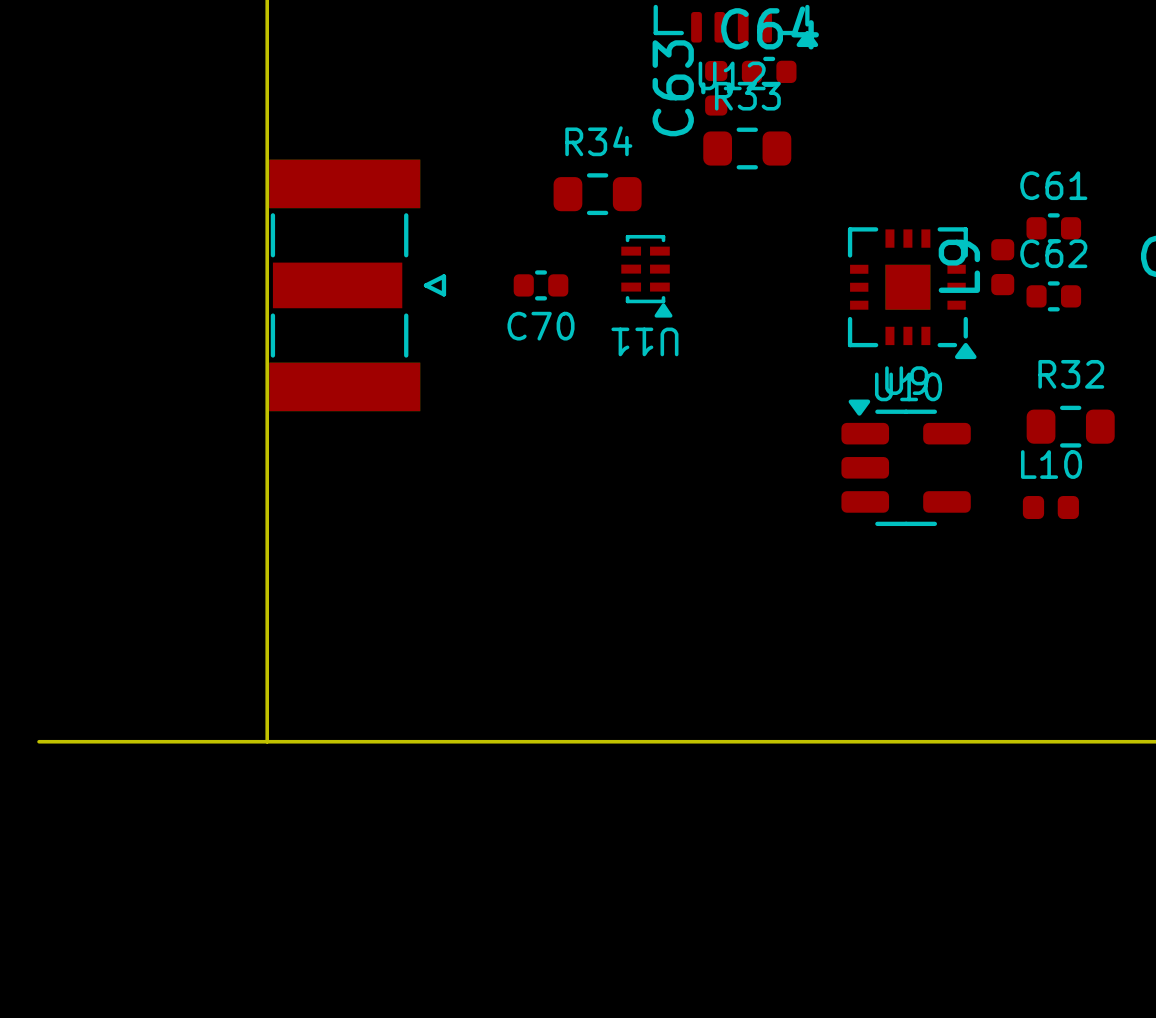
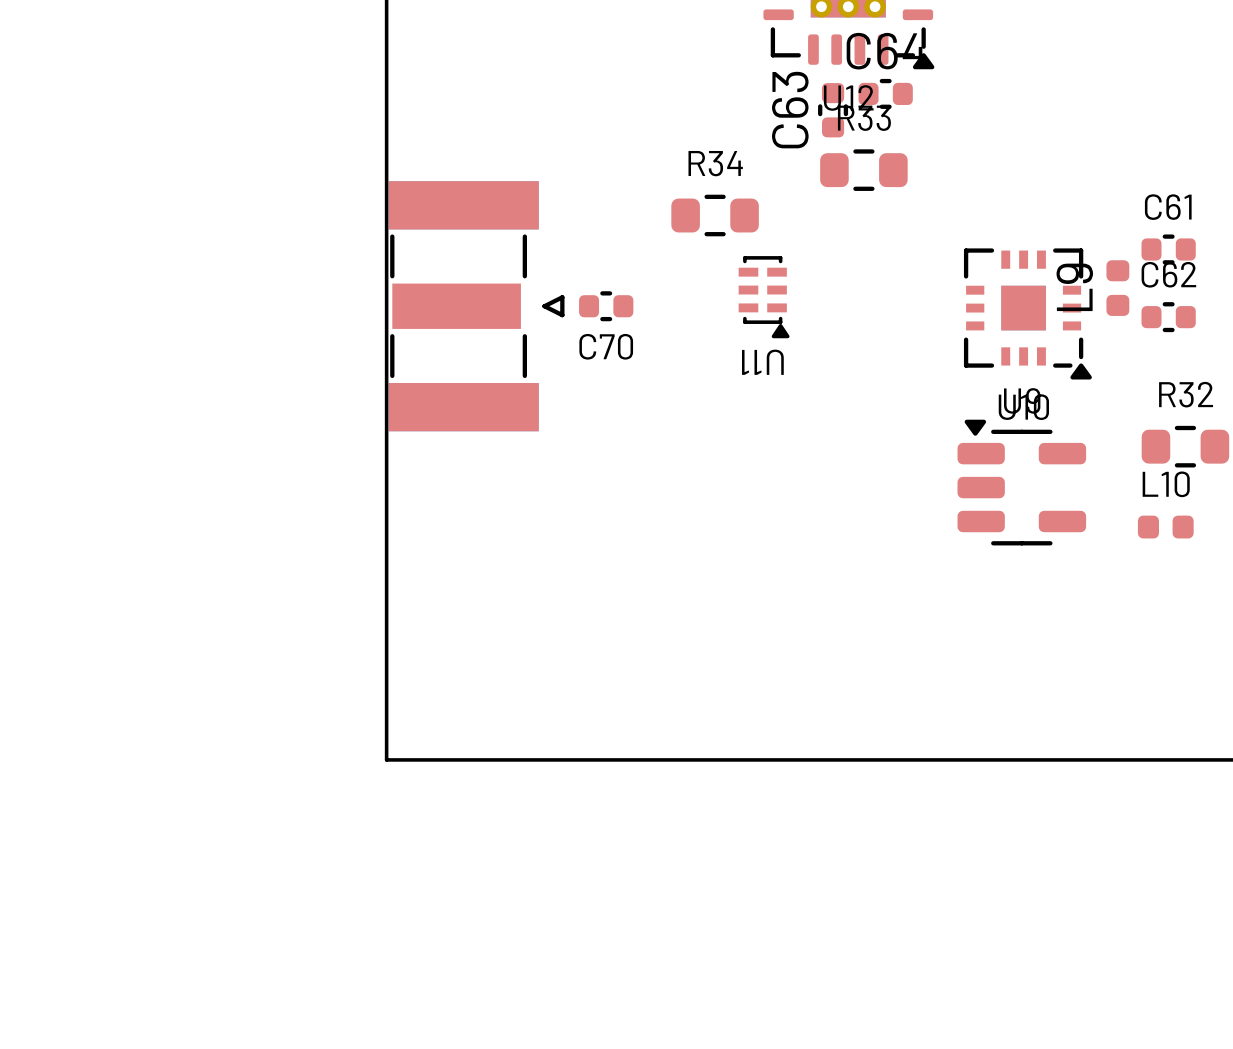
C70 position: (541, 285) -> (606, 306)
board edge: (39, 741) (267, 741) -> none

